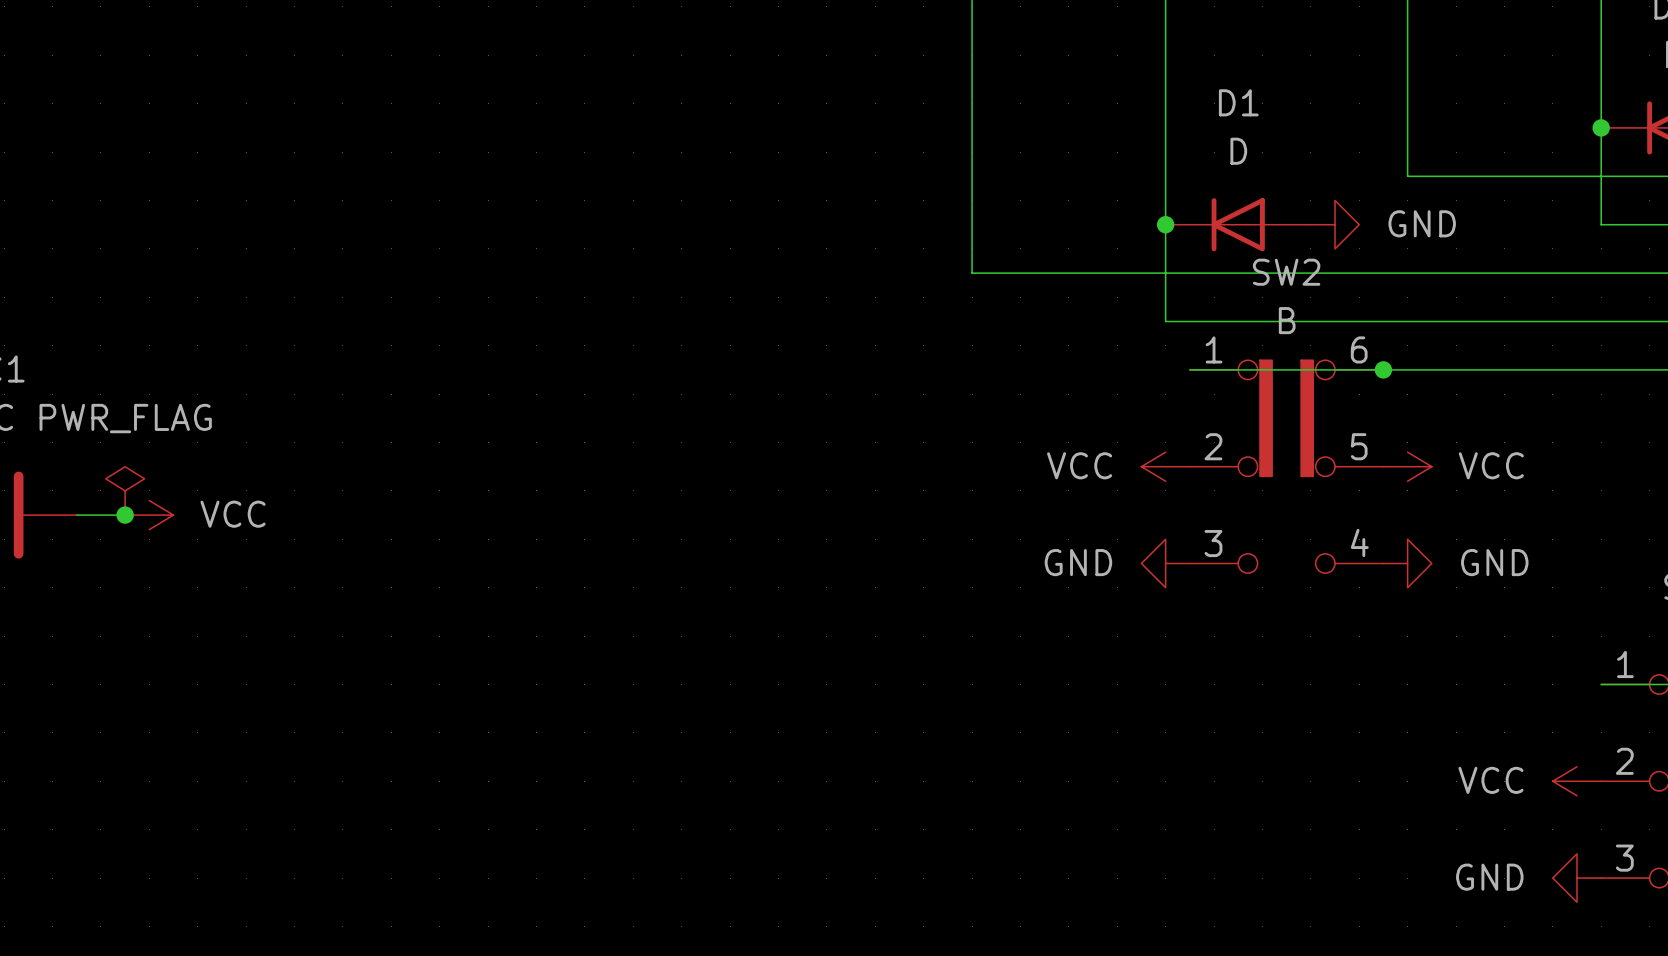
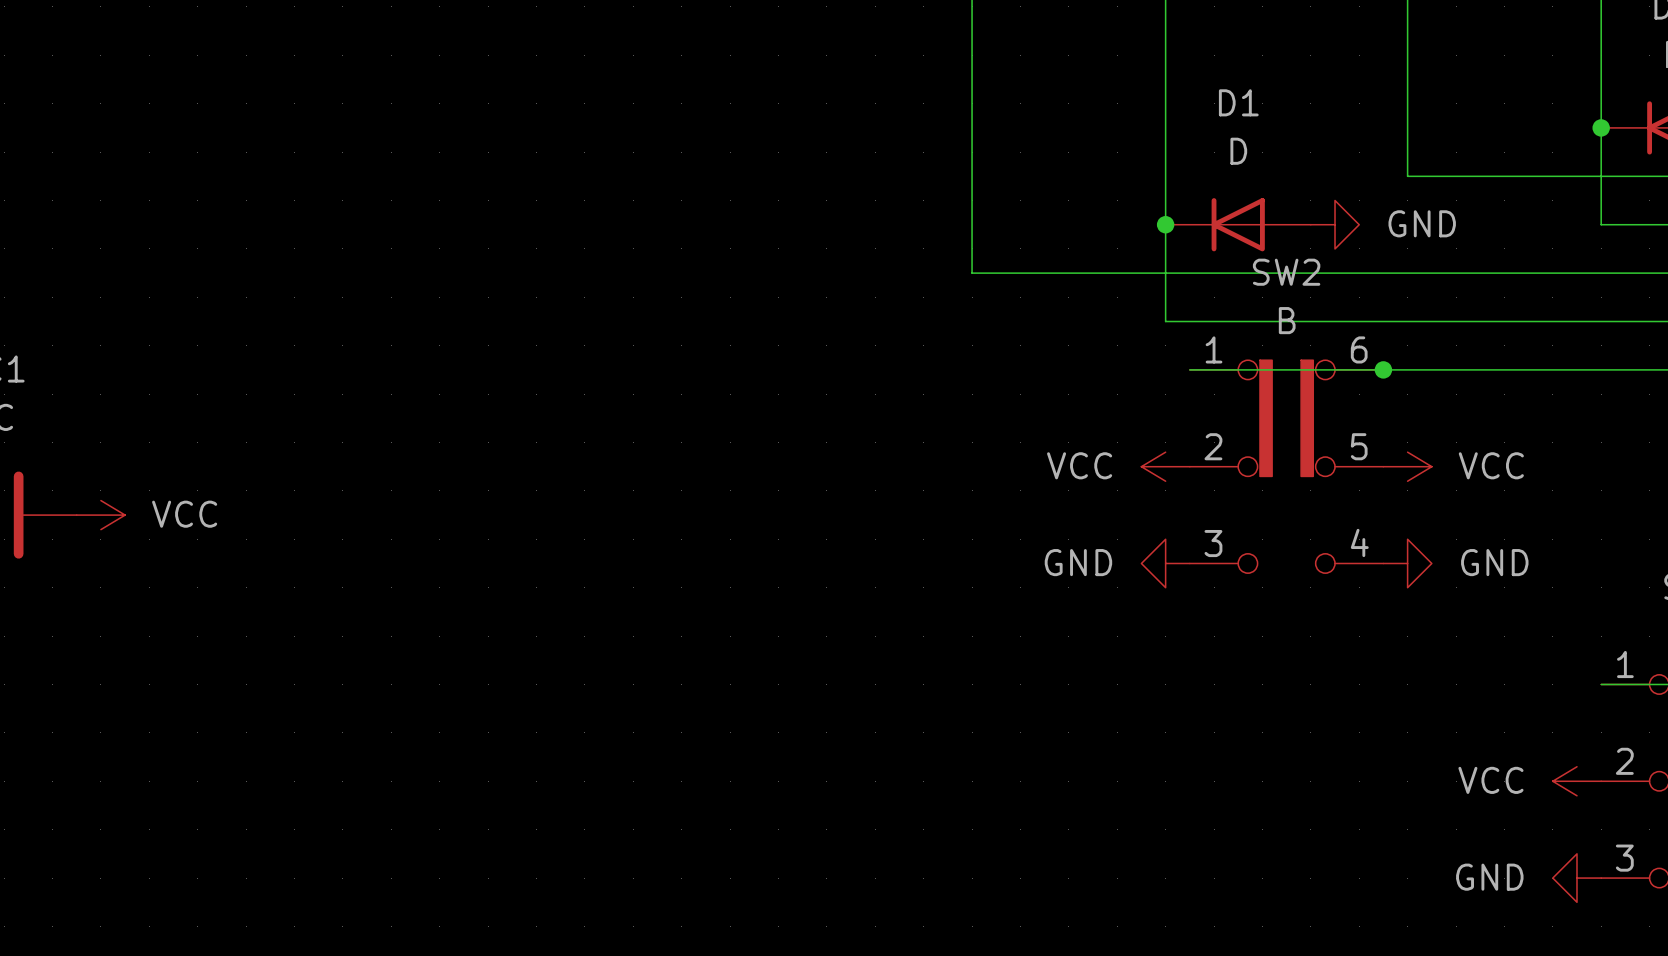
power symbol: PWR_FLAG (125, 490) -> none
junction: (125, 515) -> none
power symbol position: VCC (149, 515) -> VCC (100, 515)

